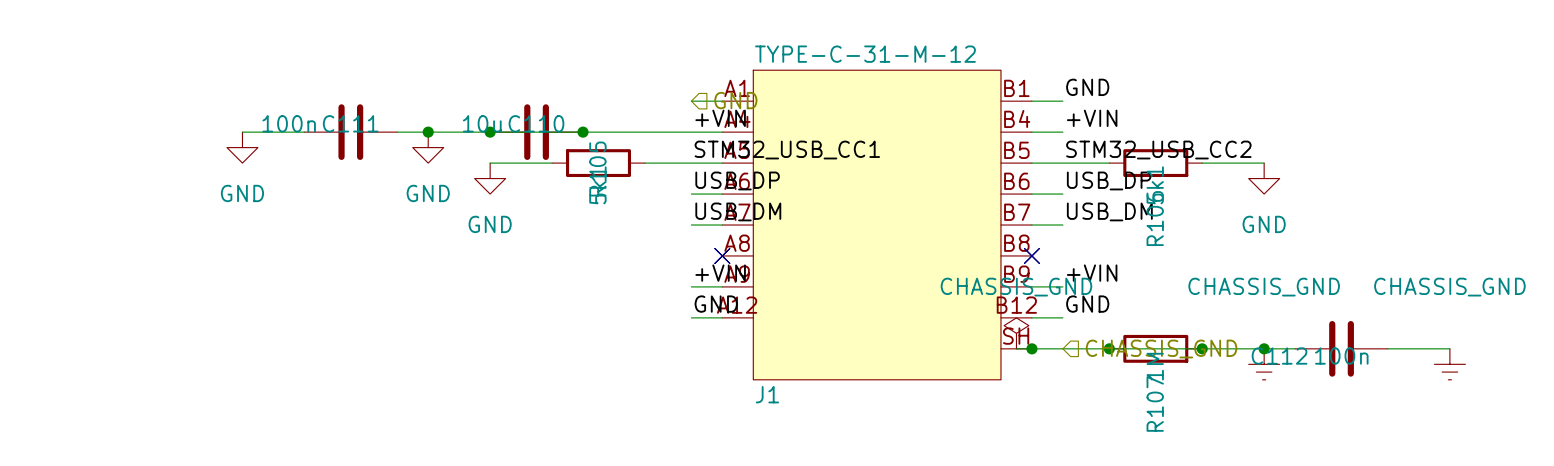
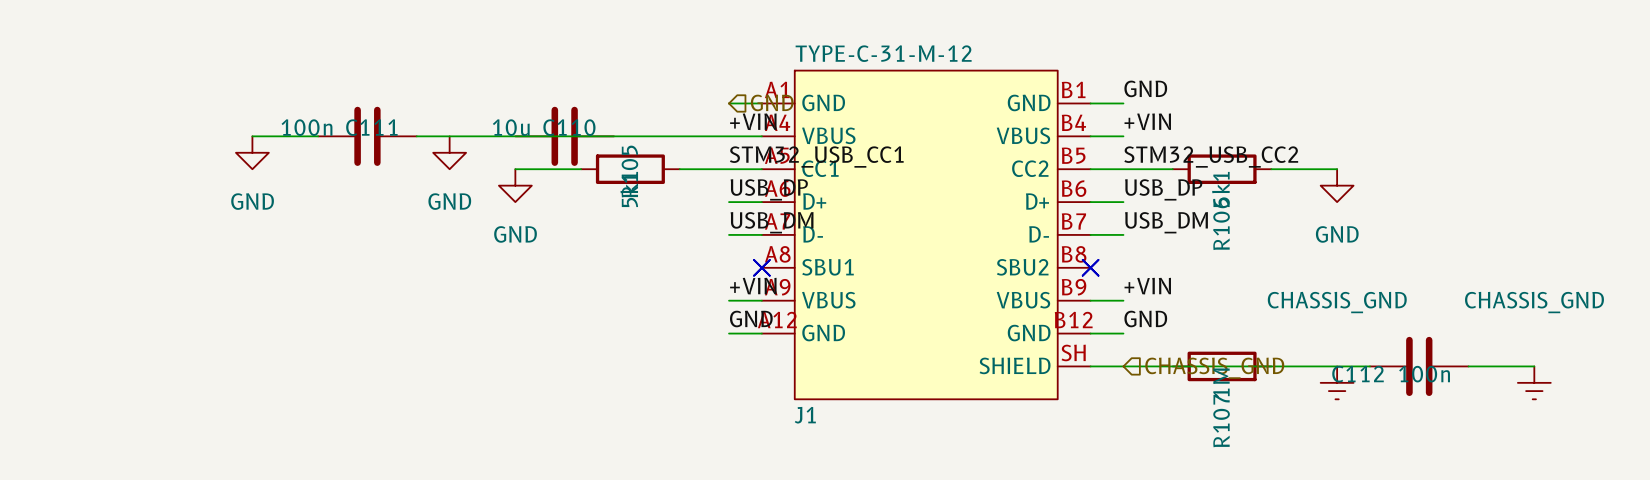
J1 symbol: [722, 70, 1032, 380] -> [761, 70, 1091, 400]
junction: (428, 132) -> none
junction: (490, 132) -> none
junction: (583, 132) -> none
power symbol: CHASSIS_GND (1016, 333) -> none
junction: (1031, 348) -> none
junction: (1109, 348) -> none
junction: (1202, 348) -> none
junction: (1264, 348) -> none

